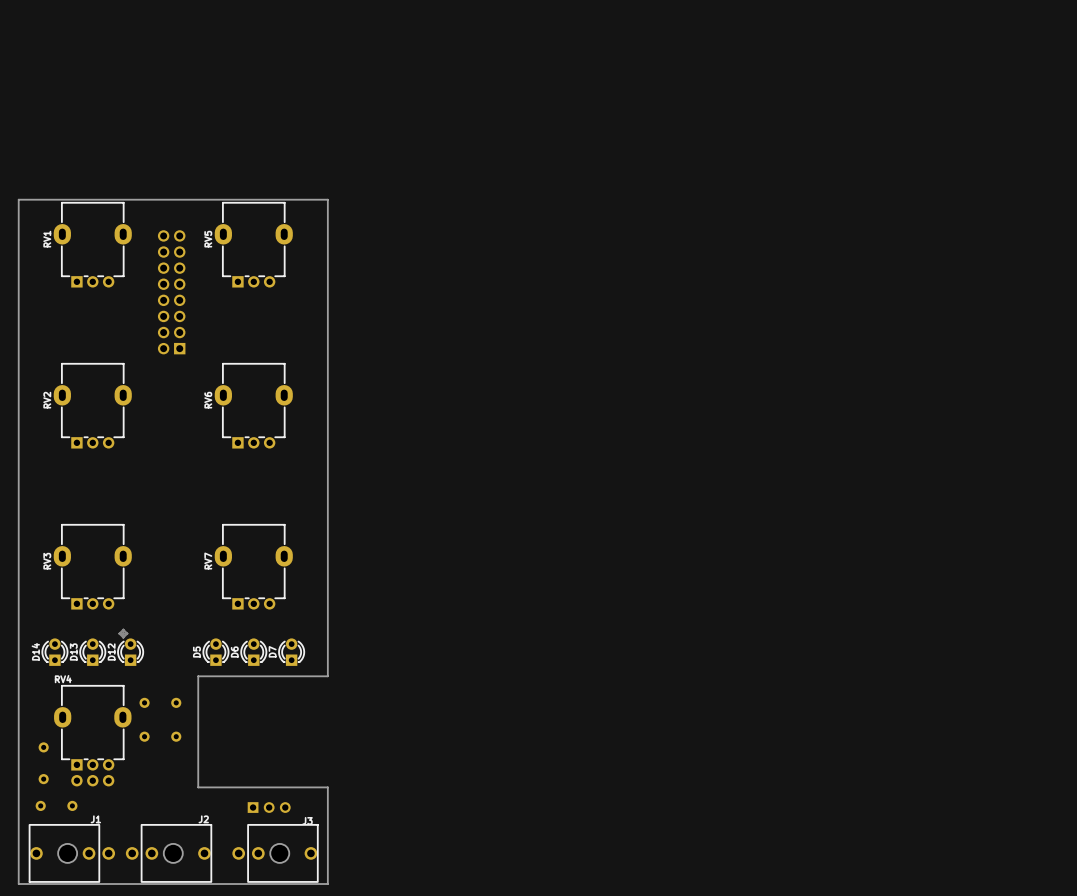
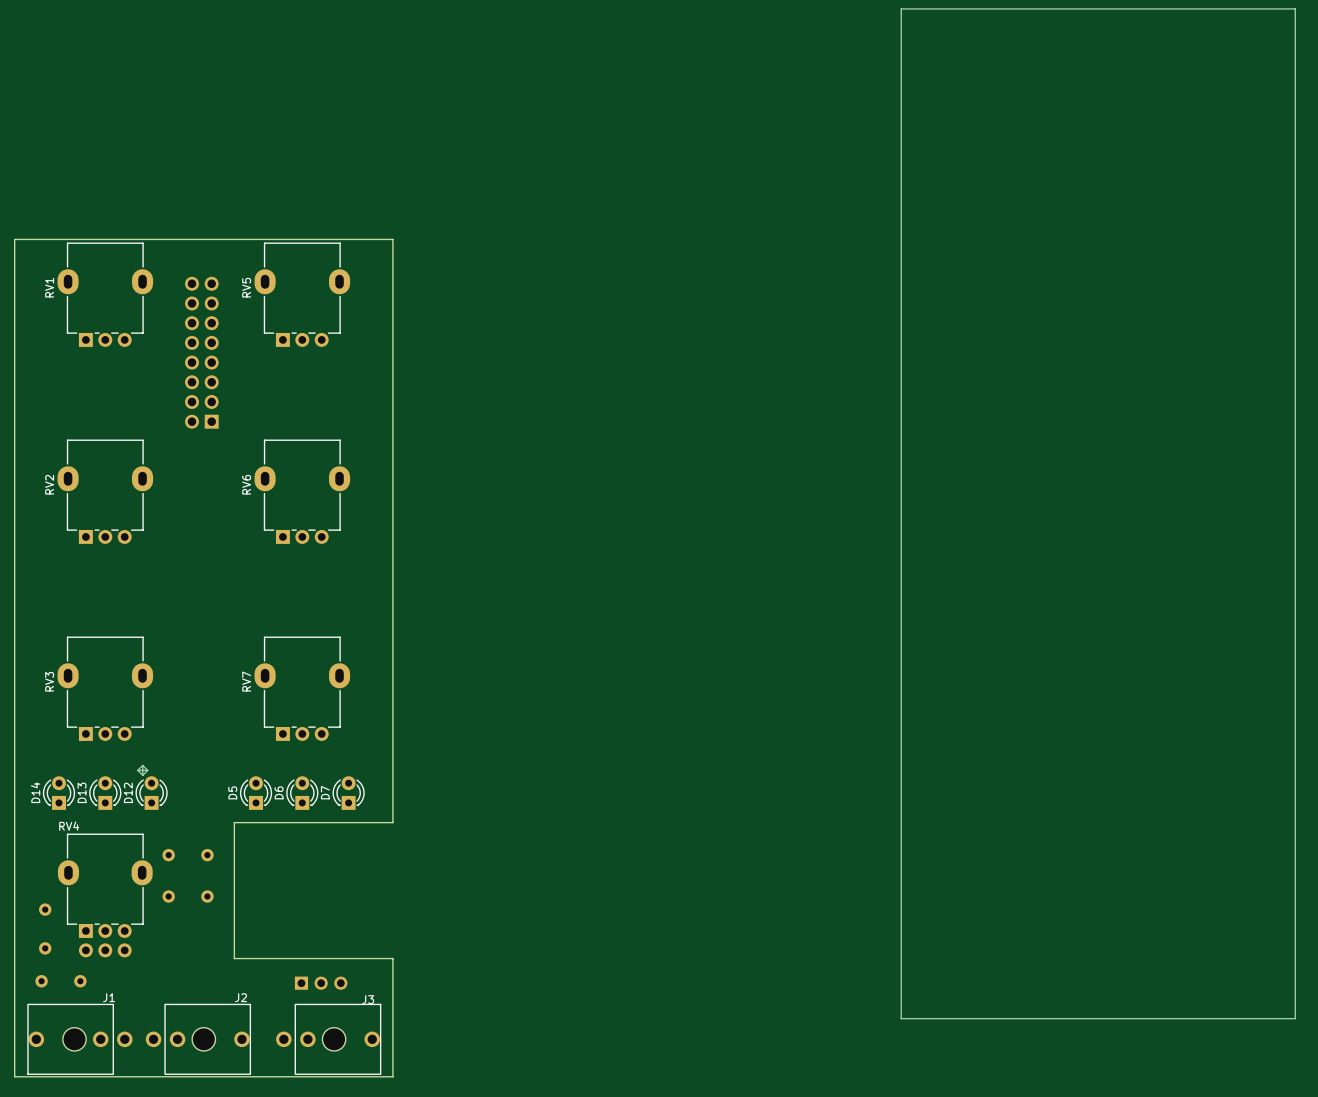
line: none -> (901, 8) (1295, 8) (1295, 1018) (901, 1018) (901, 8)

